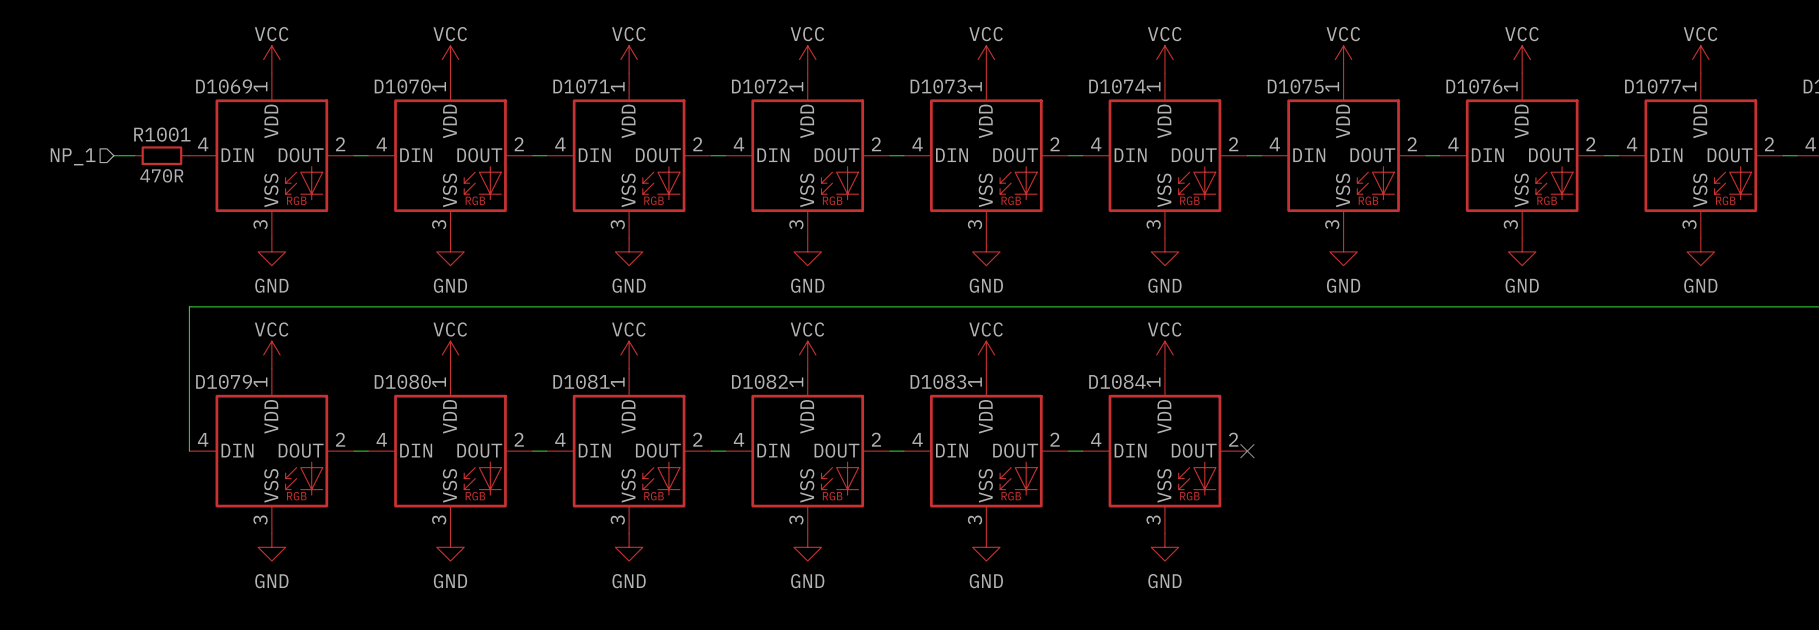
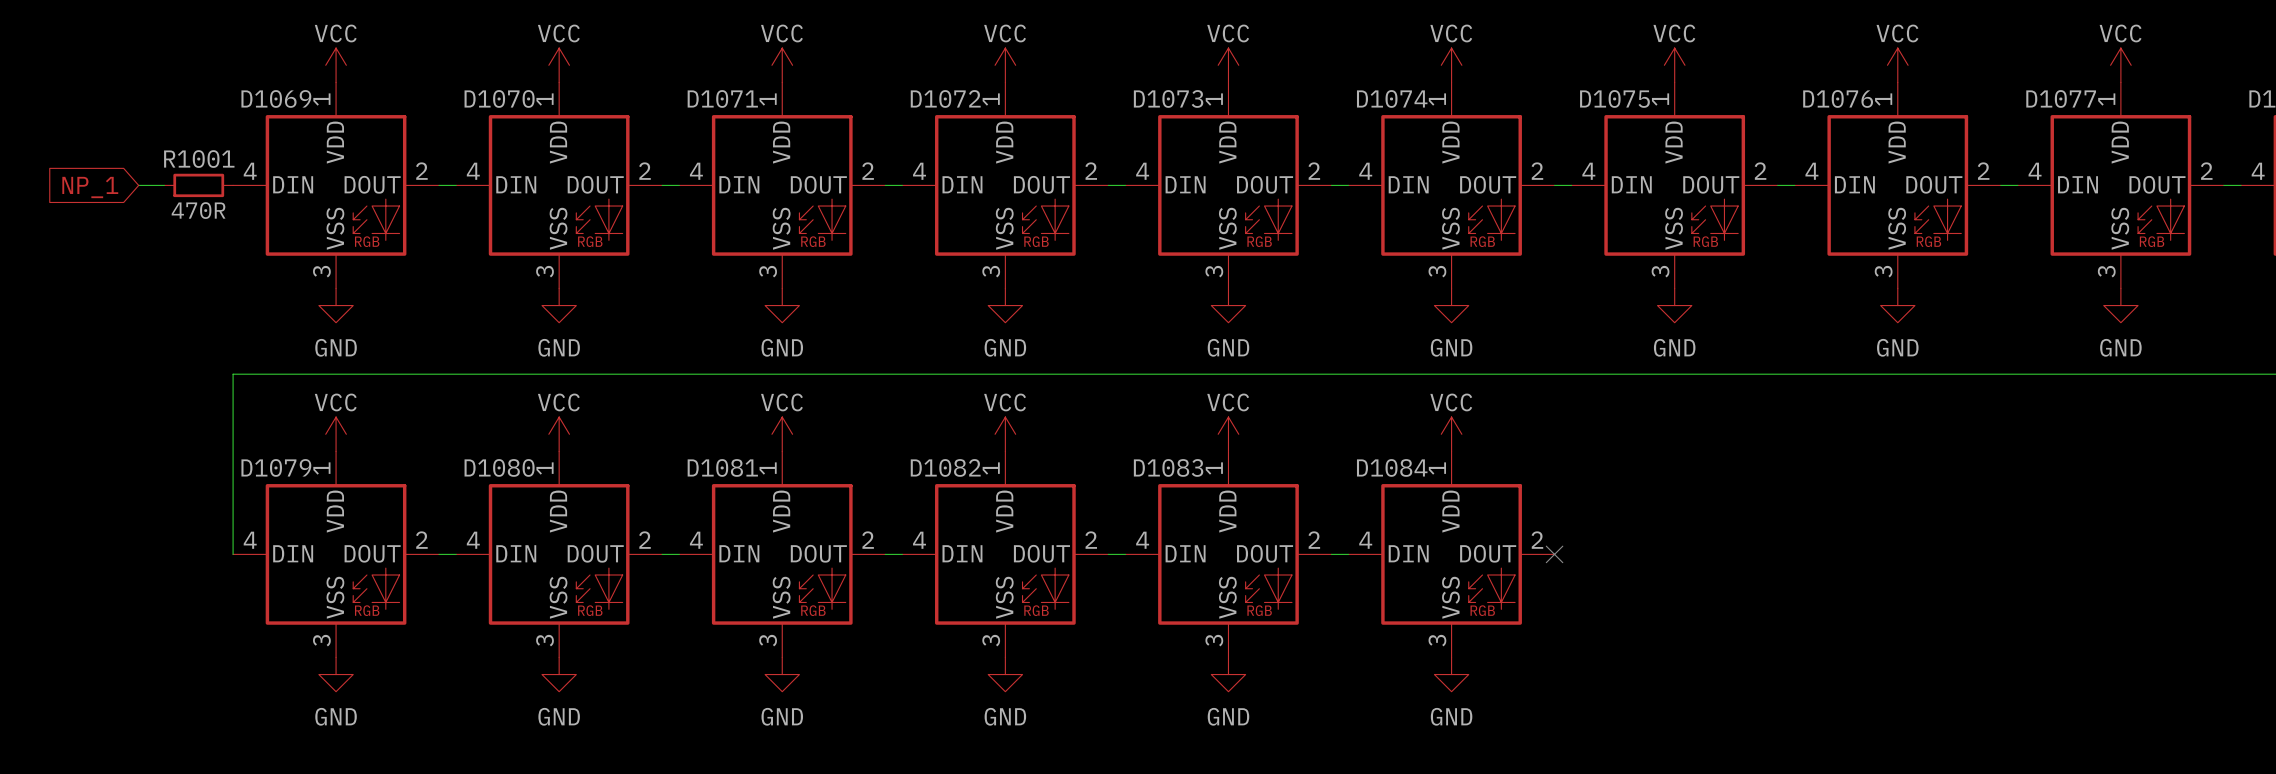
hierarchical label: NP_1 (73, 156) -> none
global label: none -> NP_1 (90, 187)

